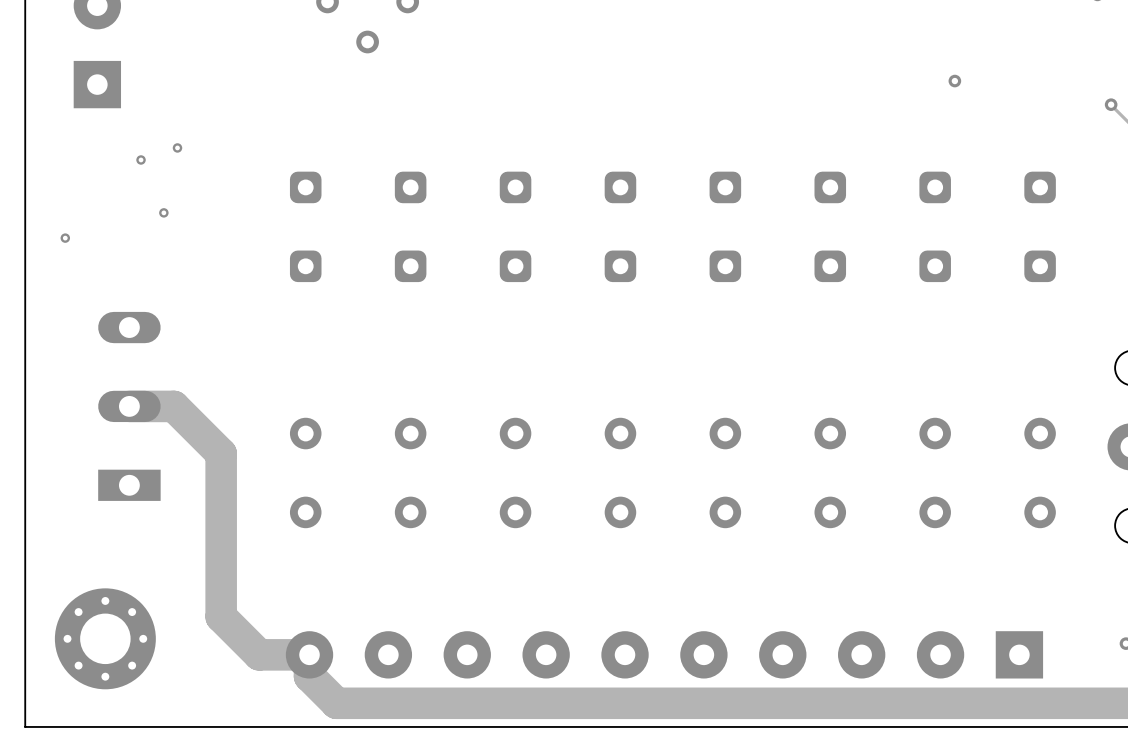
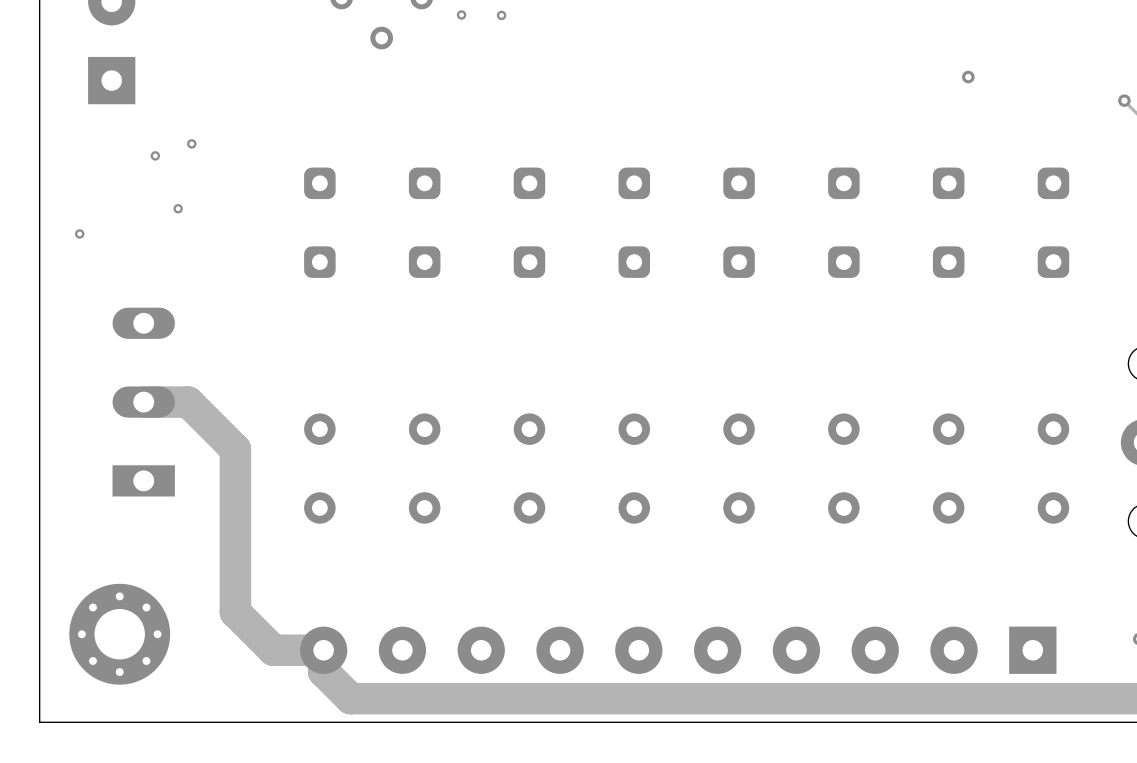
via: none -> (461, 14)
via: none -> (501, 15)

